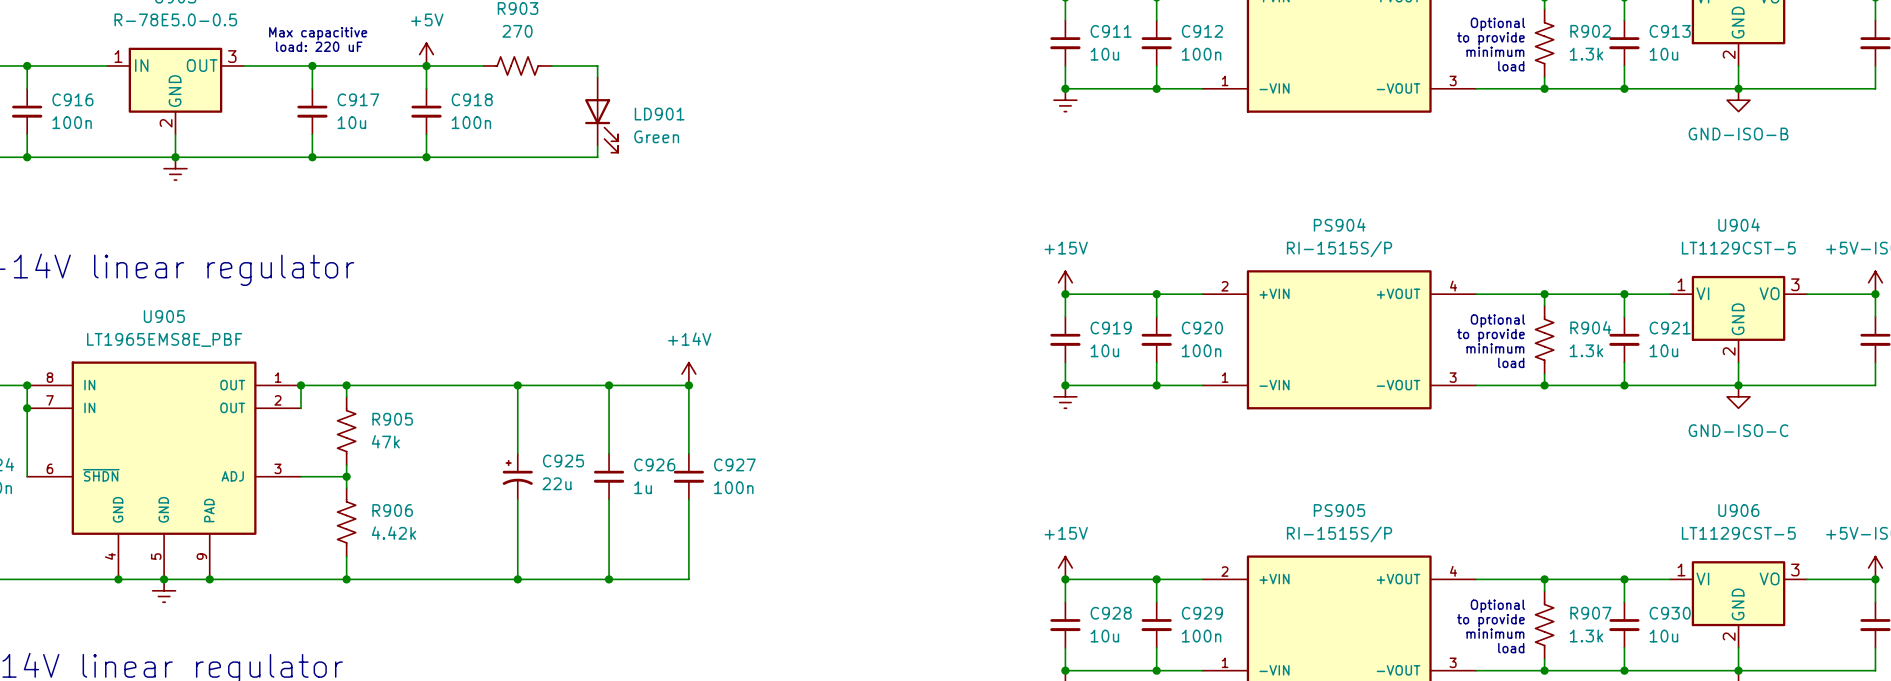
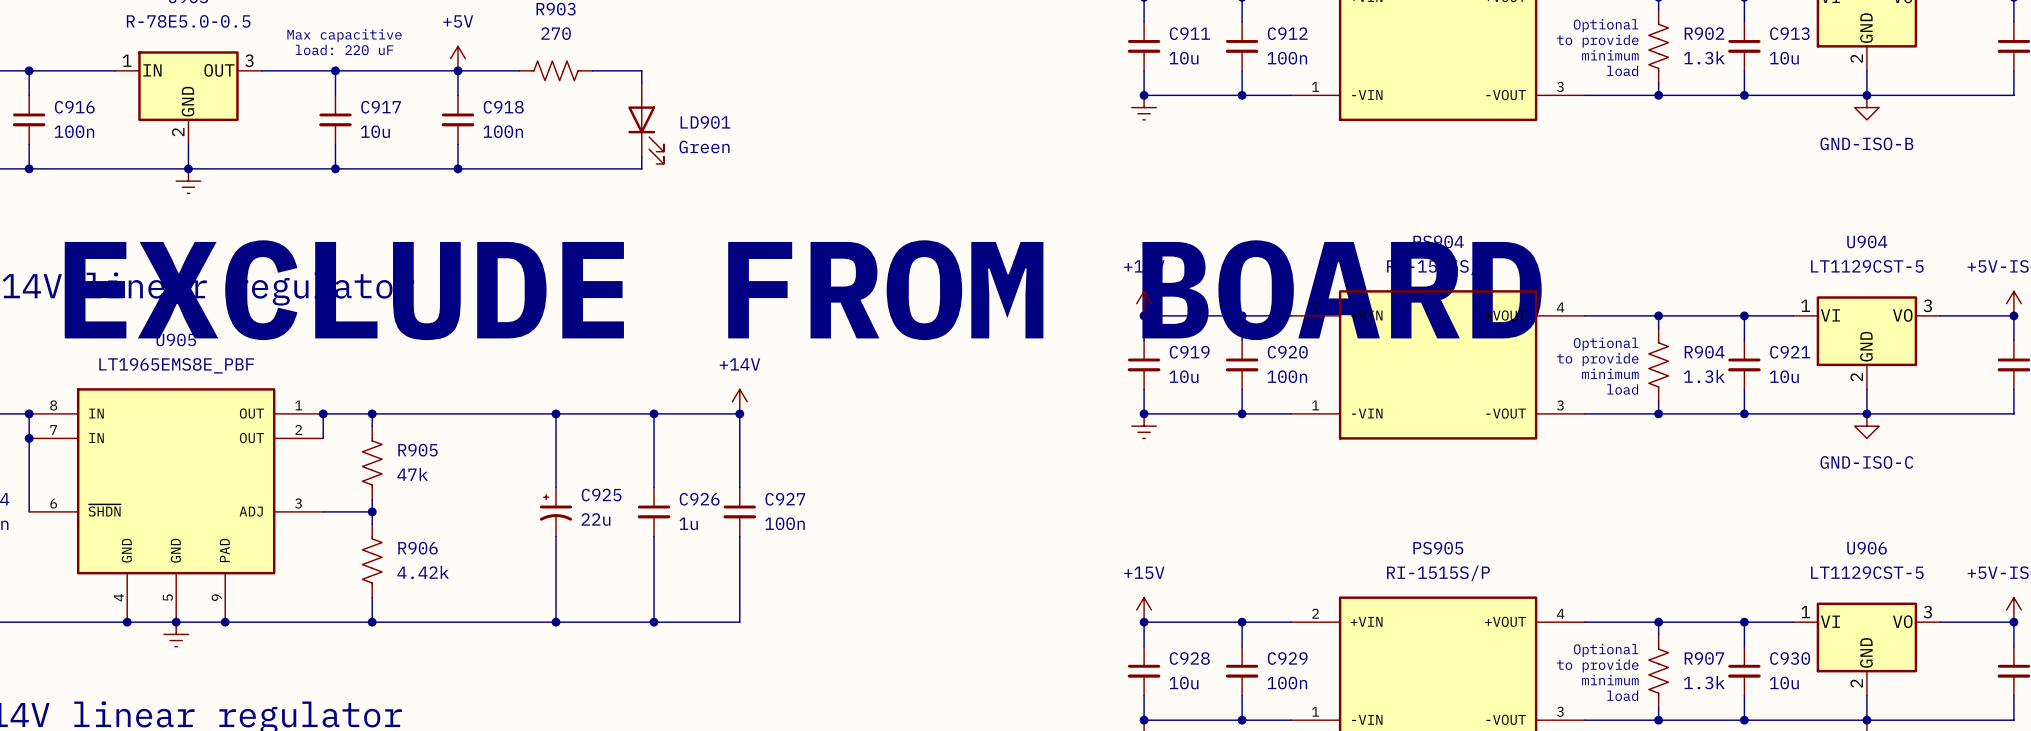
text: none -> EXCLUDE FROM BOARD (803, 290)

